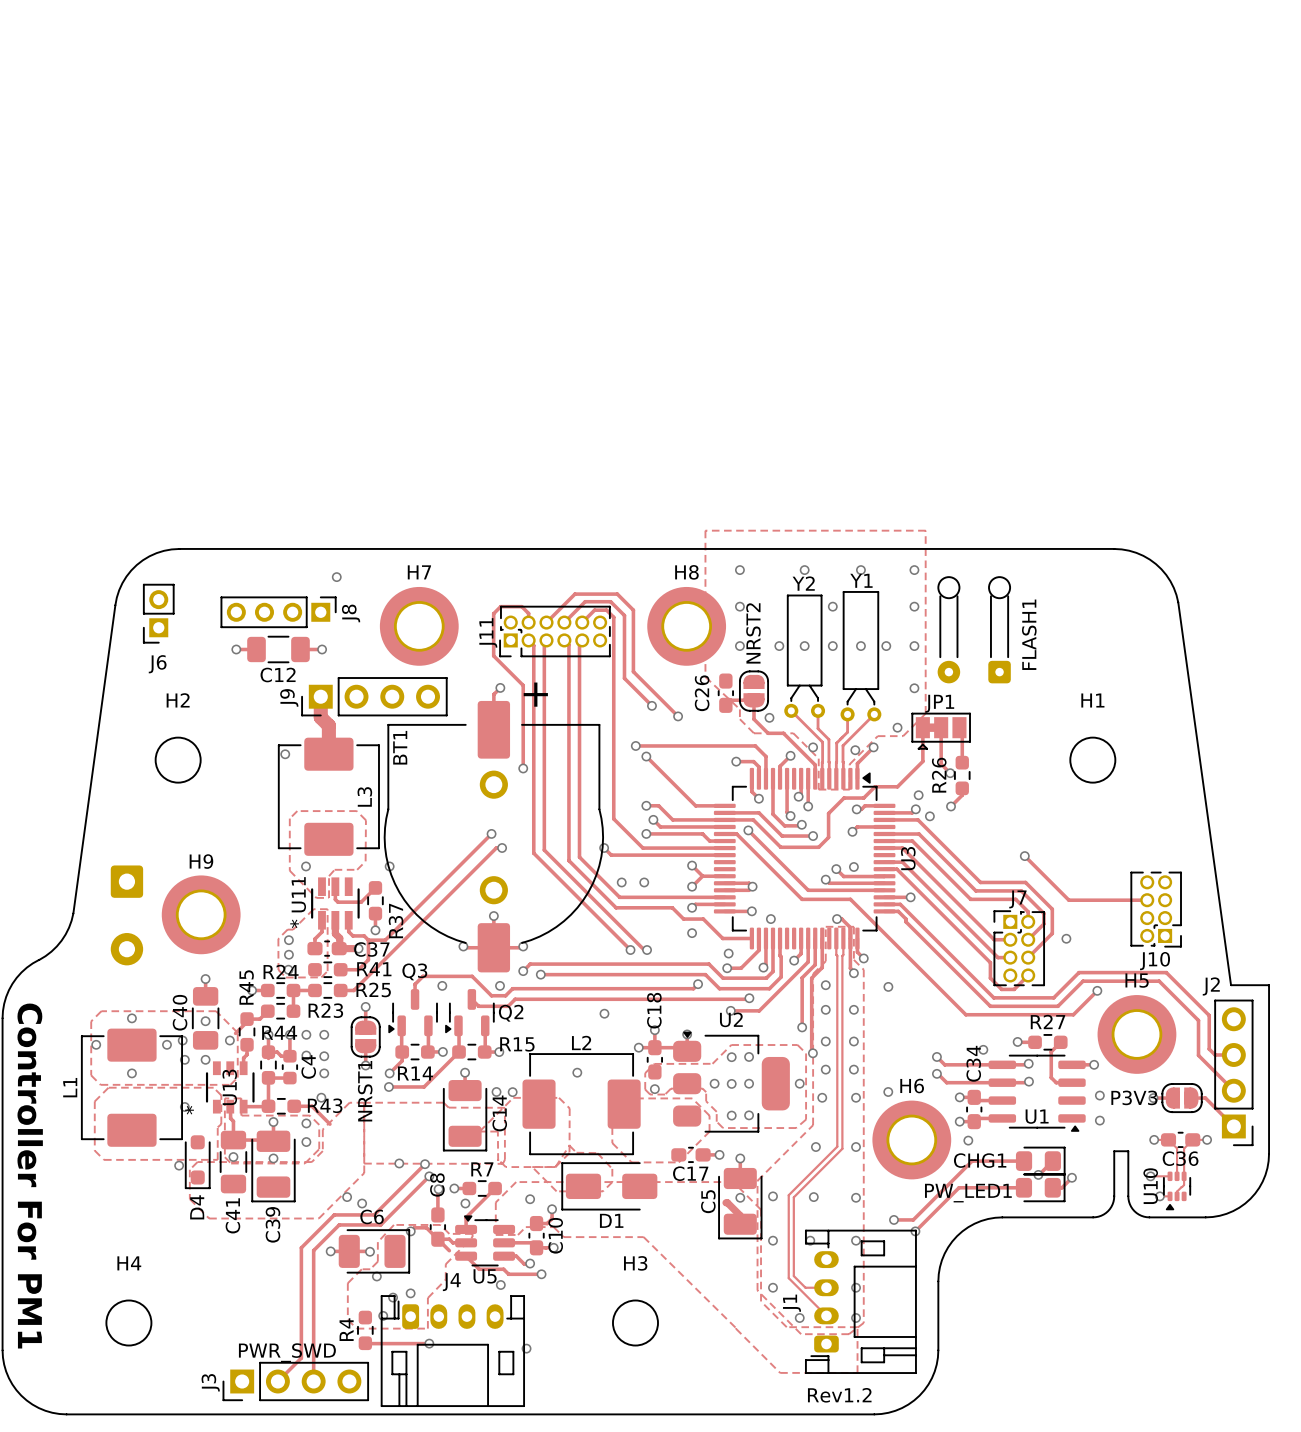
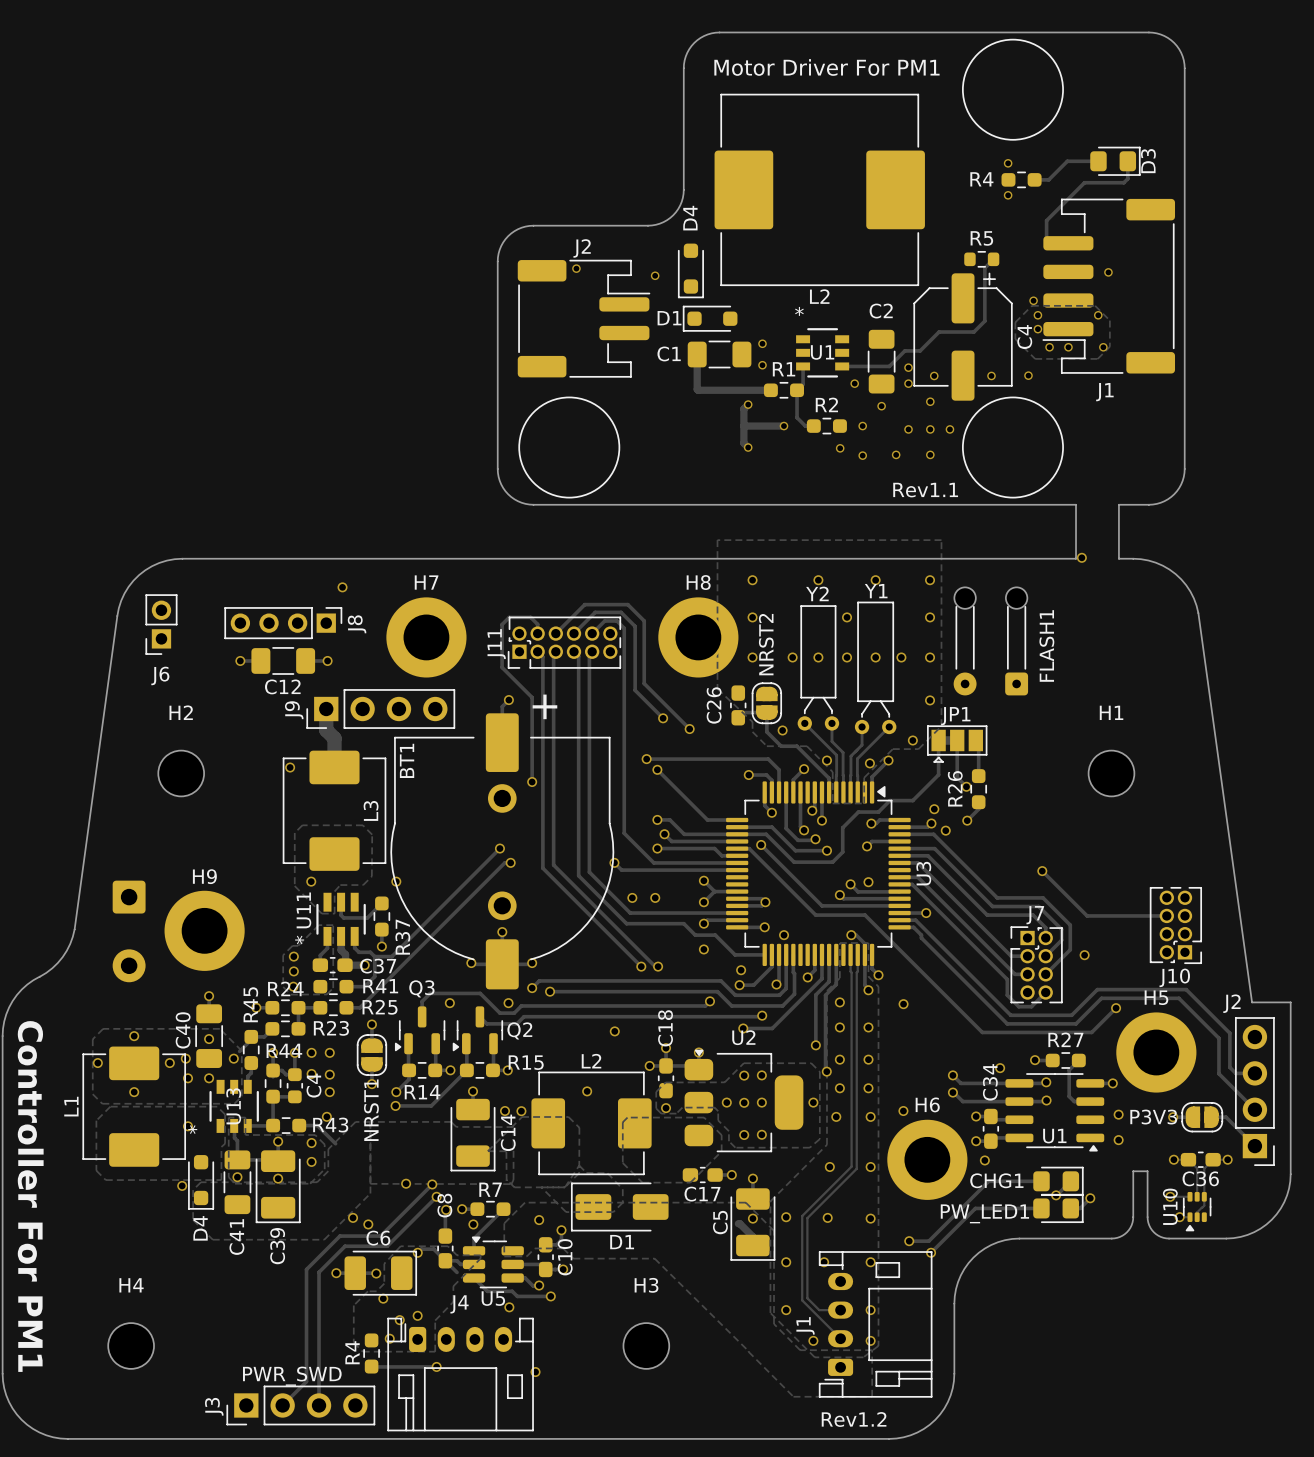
drawing: none -> [962, 38, 1064, 141]
text: none -> Motor Driver For PM1 (826, 67)
track: none -> (1098, 161) (1067, 161) (1048, 179) (1034, 179)
D3: none -> (1115, 161)
track: none -> (1127, 161) (1127, 178) (1123, 182) (1084, 182) (1046, 220) (1046, 242)
via: none -> (1008, 163)
R4: none -> (1021, 179)
L2: none -> (819, 189)
via: none -> (1008, 195)
R5: none -> (981, 259)
track: none -> (993, 259) (984, 268) (984, 321) (973, 332) (939, 332) (920, 350) (904, 350) (889, 366) (842, 366)
via: none -> (576, 268)
D4: none -> (690, 270)
via: none -> (1108, 272)
via: none -> (655, 275)
J1: none -> (1108, 286)
via: none -> (1033, 300)
zone outline: none -> (1031, 305) (1015, 322) (1015, 339) (1035, 358) (1097, 358) (1109, 346) (1109, 320) (1095, 305) (1031, 305)
via: none -> (1037, 315)
via: none -> (1098, 315)
J2: none -> (584, 318)
D1: none -> (710, 318)
via: none -> (1037, 329)
C4: none -> (963, 336)
via: none -> (762, 343)
via: none -> (1049, 347)
via: none -> (1068, 347)
via: none -> (1103, 347)
U1: none -> (822, 352)
track: none -> (697, 354) (698, 390) (770, 390)
C1: none -> (719, 354)
C2: none -> (881, 361)
via: none -> (762, 365)
track: none -> (803, 366) (803, 384) (797, 390) (797, 417) (805, 426) (813, 426)
via: none -> (908, 367)
via: none -> (1028, 375)
via: none -> (934, 375)
via: none -> (991, 375)
via: none -> (854, 383)
via: none -> (908, 383)
R1: none -> (783, 390)
drawing: none -> [518, 396, 621, 499]
drawing: none -> [962, 396, 1064, 499]
via: none -> (930, 401)
track: none -> (748, 404) (743, 408) (743, 443) (748, 447)
via: none -> (748, 404)
via: none -> (881, 406)
track: none -> (743, 426) (783, 426)
via: none -> (783, 426)
R2: none -> (826, 426)
via: none -> (862, 426)
via: none -> (908, 429)
via: none -> (930, 429)
via: none -> (949, 429)
via: none -> (748, 447)
via: none -> (840, 448)
via: none -> (896, 454)
via: none -> (930, 454)
via: none -> (862, 455)
text: none -> Rev1.1 (925, 490)
board edge: (1057, 548) (1100, 548) -> (1076, 558) (1076, 504) (533, 504) (517, 501) (503, 488) (497, 473) (497, 261) (501, 245) (511, 233) (525, 226) (652, 225) (663, 222) (673, 215) (680, 205) (683, 193) (684, 60) (694, 42) (707, 34) (719, 32) (1148, 32) (1164, 36) (1179, 49) (1184, 68) (1184, 473) (1176, 491) (1164, 501) (1152, 504) (1118, 504) (1118, 558)
via: none -> (1081, 557)

